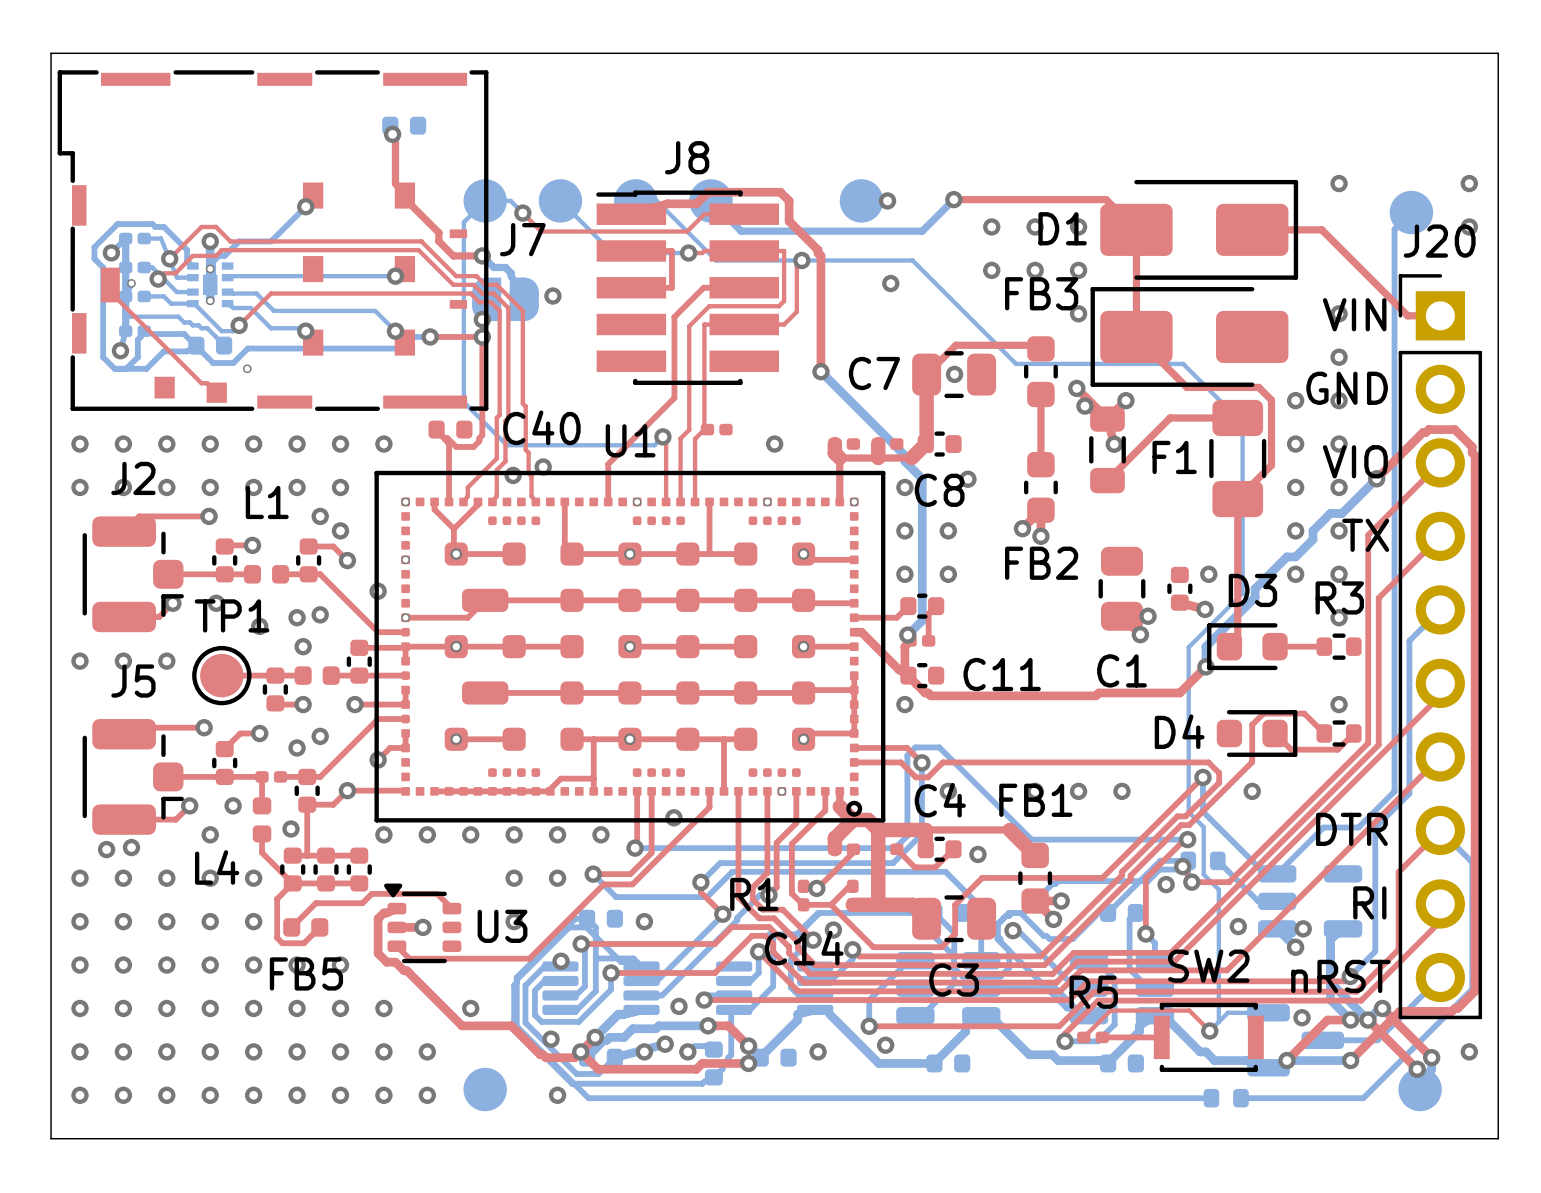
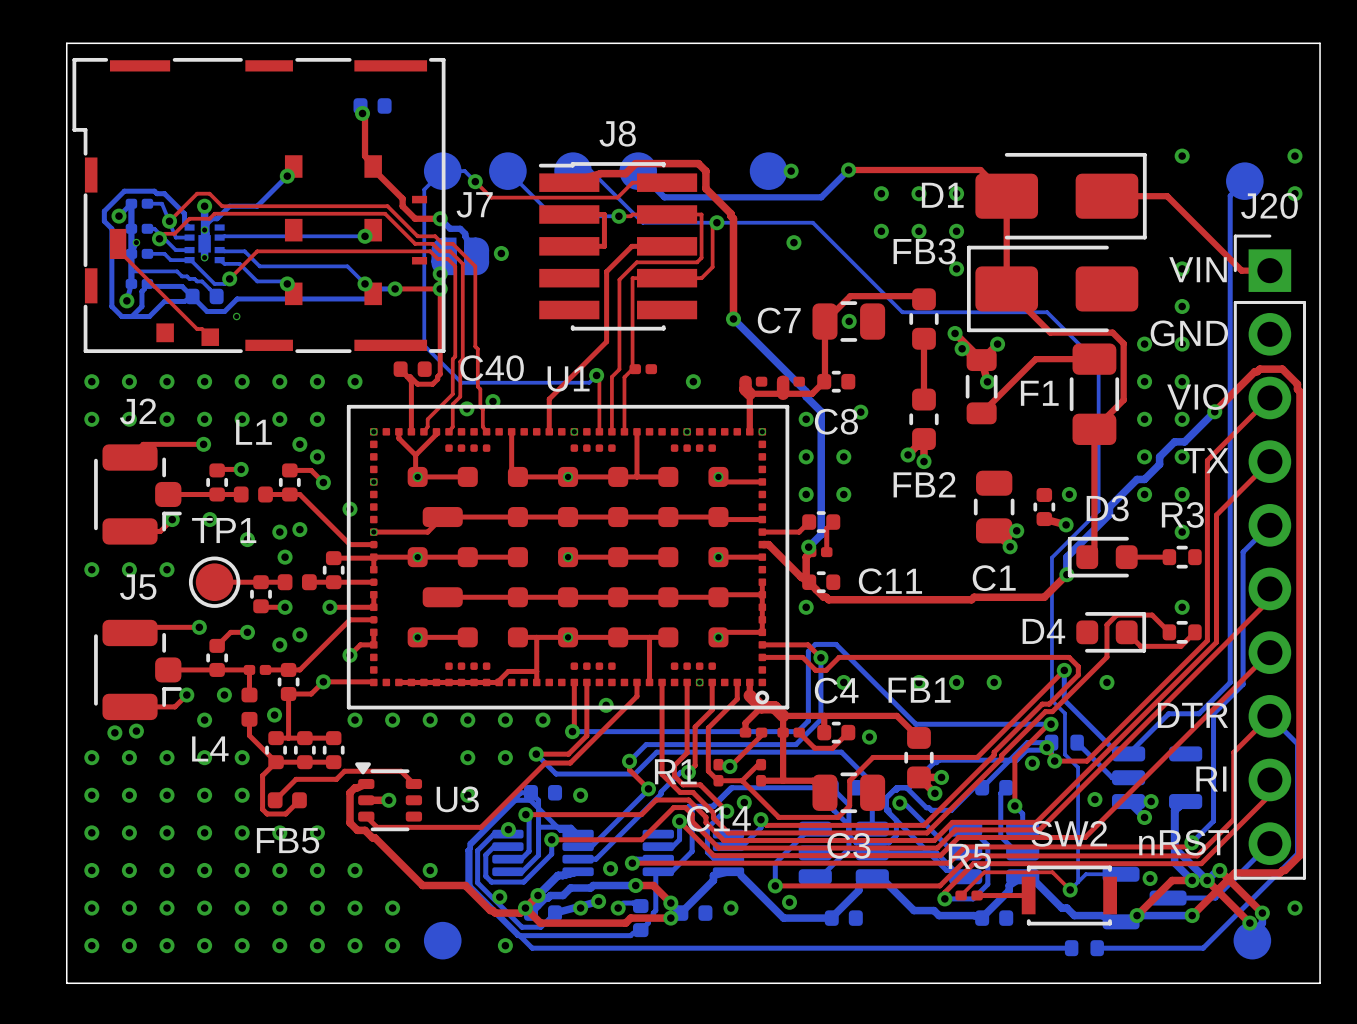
top track width: thick (926, 374) (926, 443) (911, 458) -> thin (824, 321) (824, 380) (812, 393)
top track width: thick (853, 819) (834, 838) (834, 849) -> thin (761, 707) (745, 723) (745, 732)
top track width: thick (1009, 829) (1035, 855) -> thin (896, 715) (918, 737)
top track width: thick (925, 849) (925, 829) (878, 829) (878, 904) -> thin (824, 732) (824, 715) (783, 715) (783, 780)
top track width: thick (852, 904) (912, 904) (926, 918) -> thin (761, 780) (812, 780) (824, 792)

